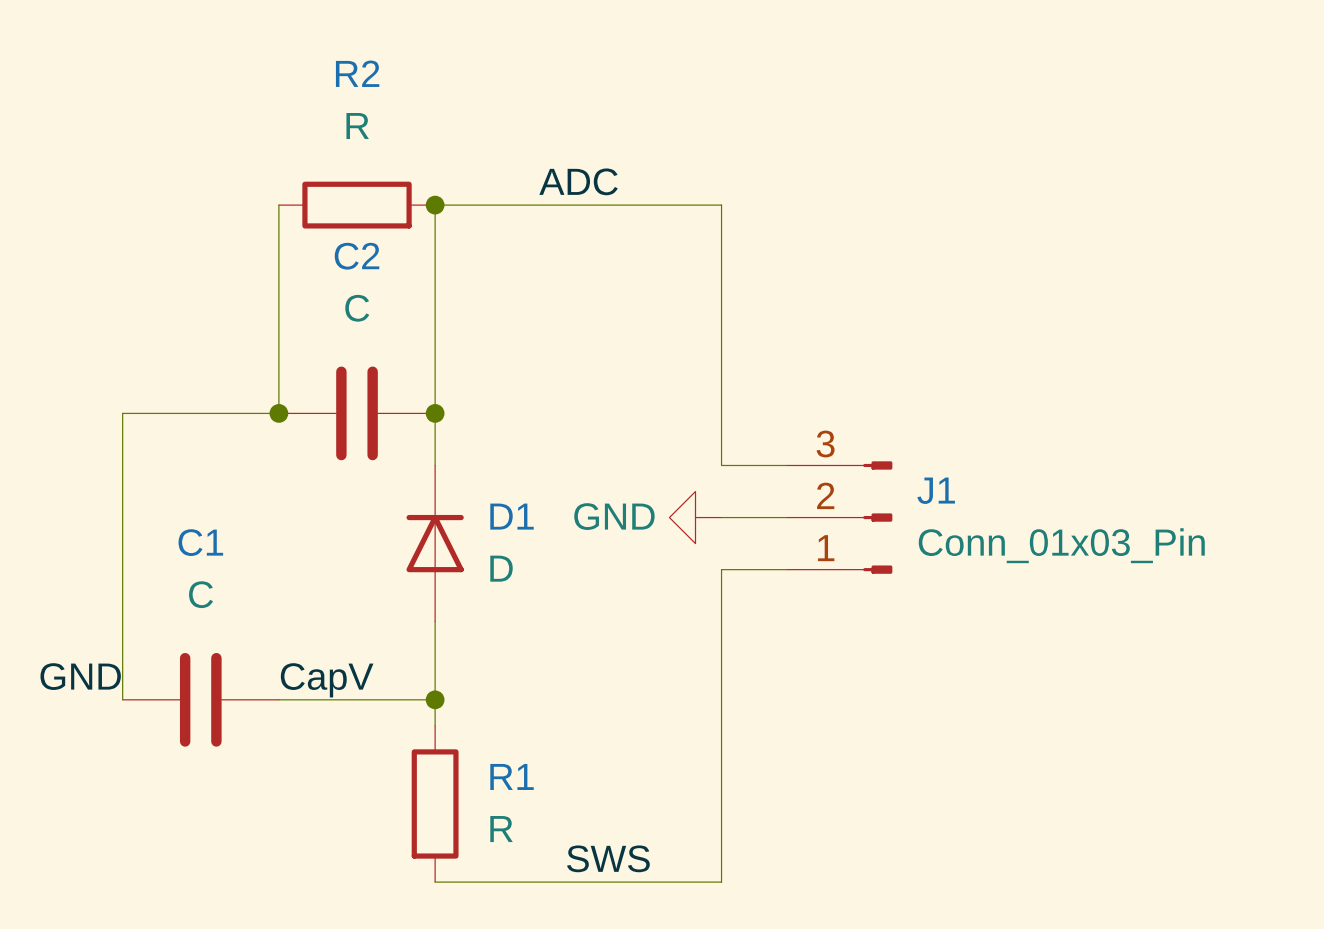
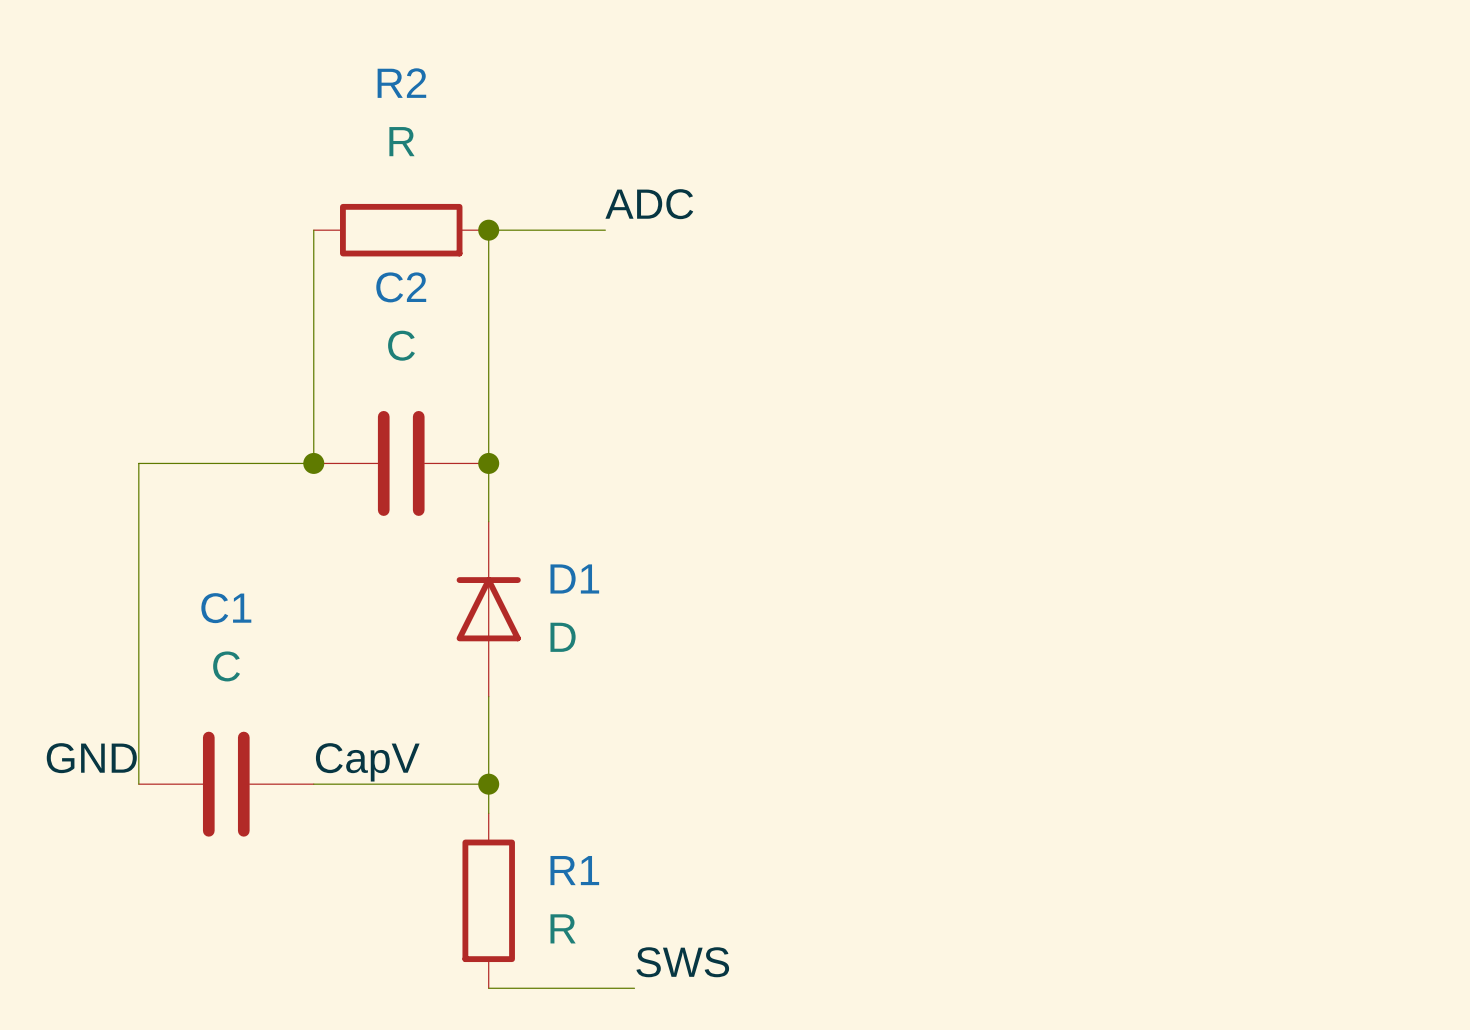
wire: (539, 205) (721, 205) (721, 465) (786, 465) -> none
power symbol: GND (695, 517) -> none
wire: (721, 517) (786, 517) -> none
J1: Conn_01x03_Pin (839, 517) -> none
wire: (786, 569) (721, 569) (721, 882) (565, 882) -> none

